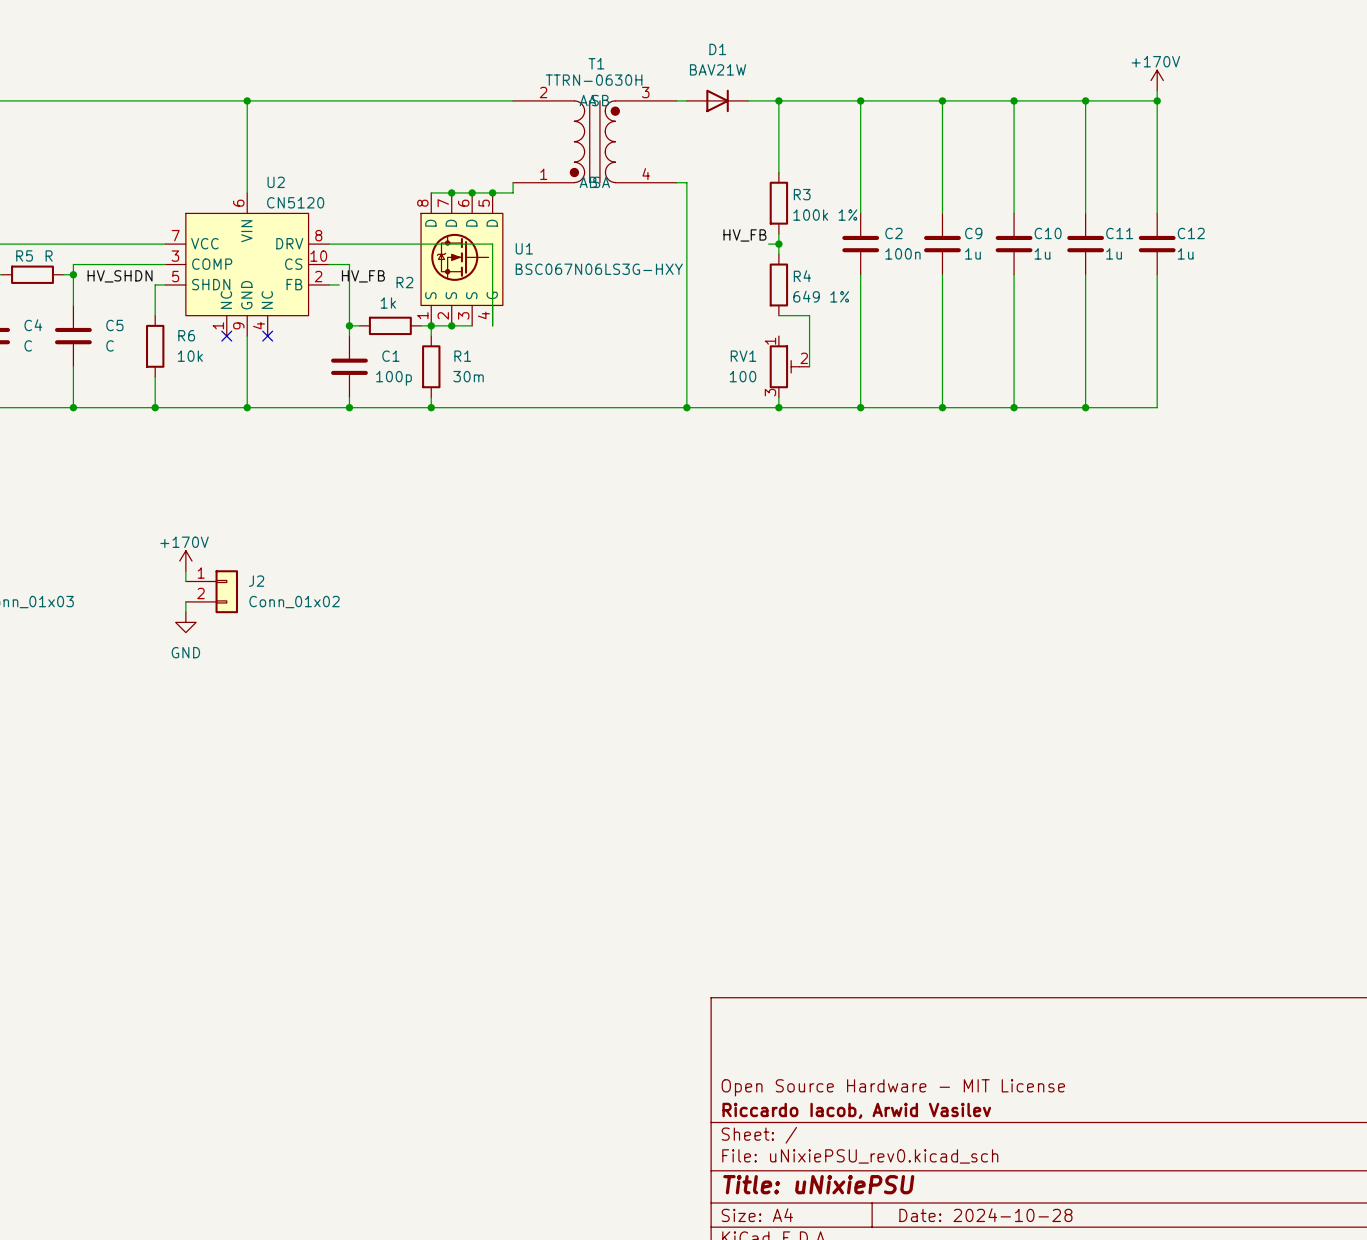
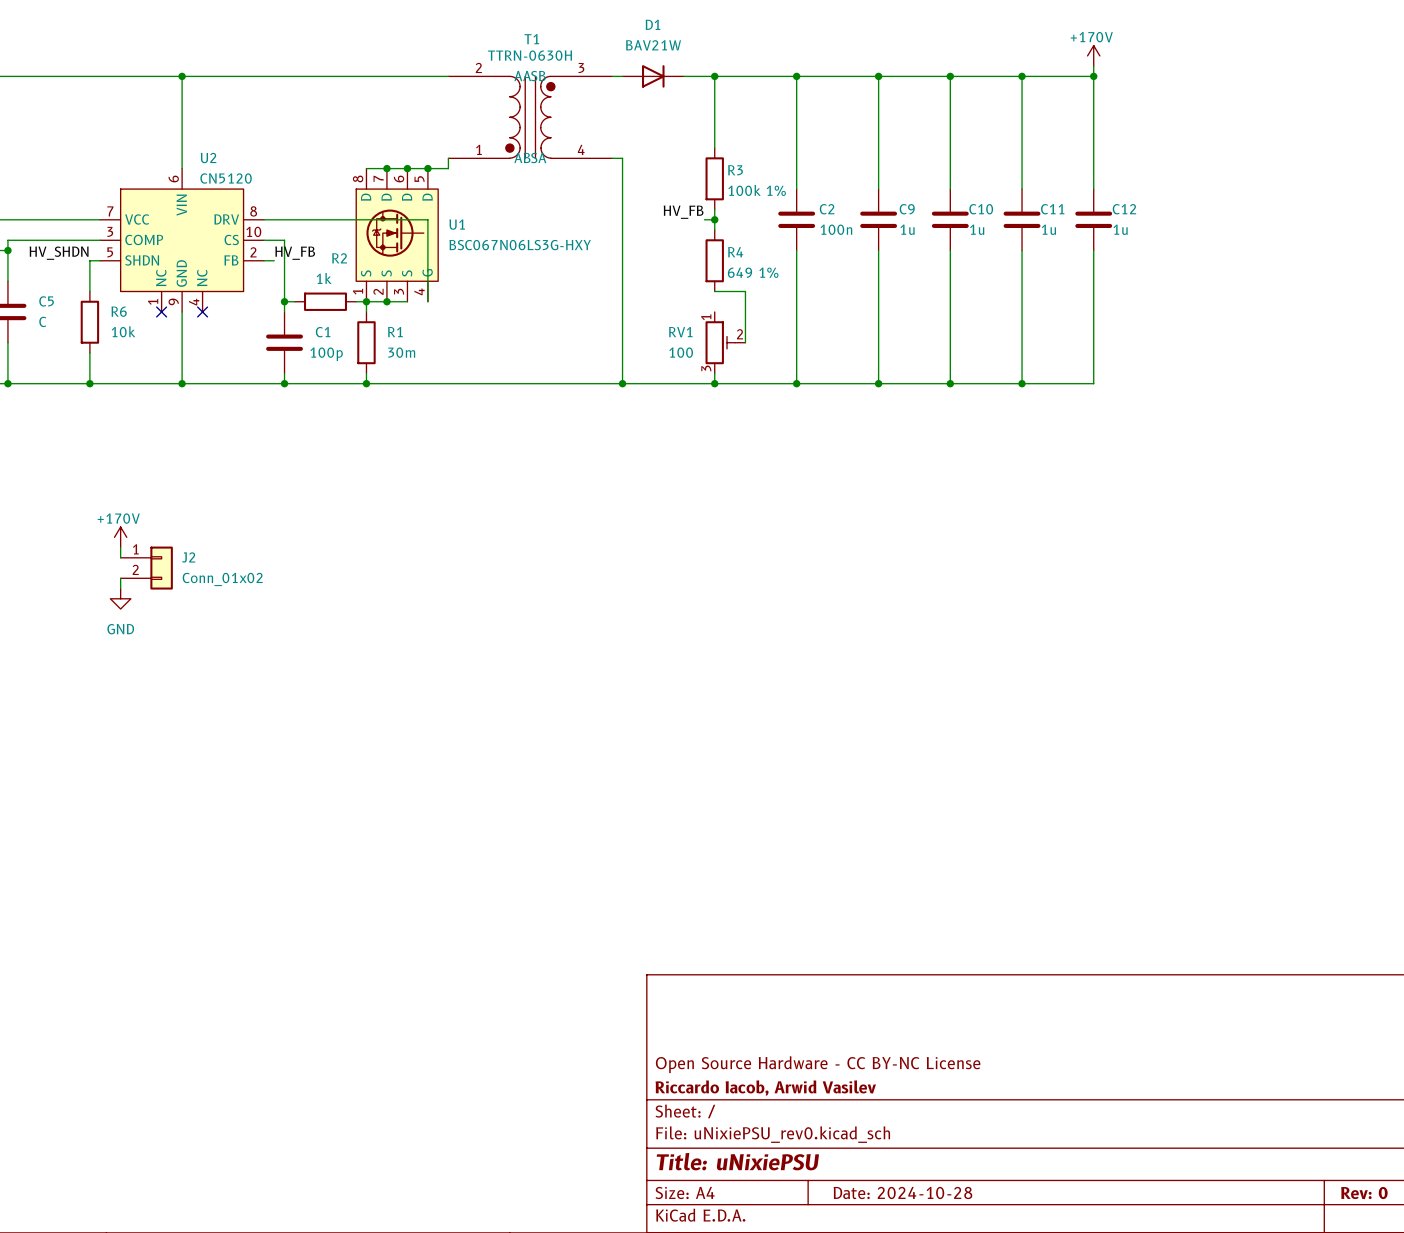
title block: Open Source Hardware - MIT License (893, 1087) -> Open Source Hardware - CC BY-NC License (818, 1064)

